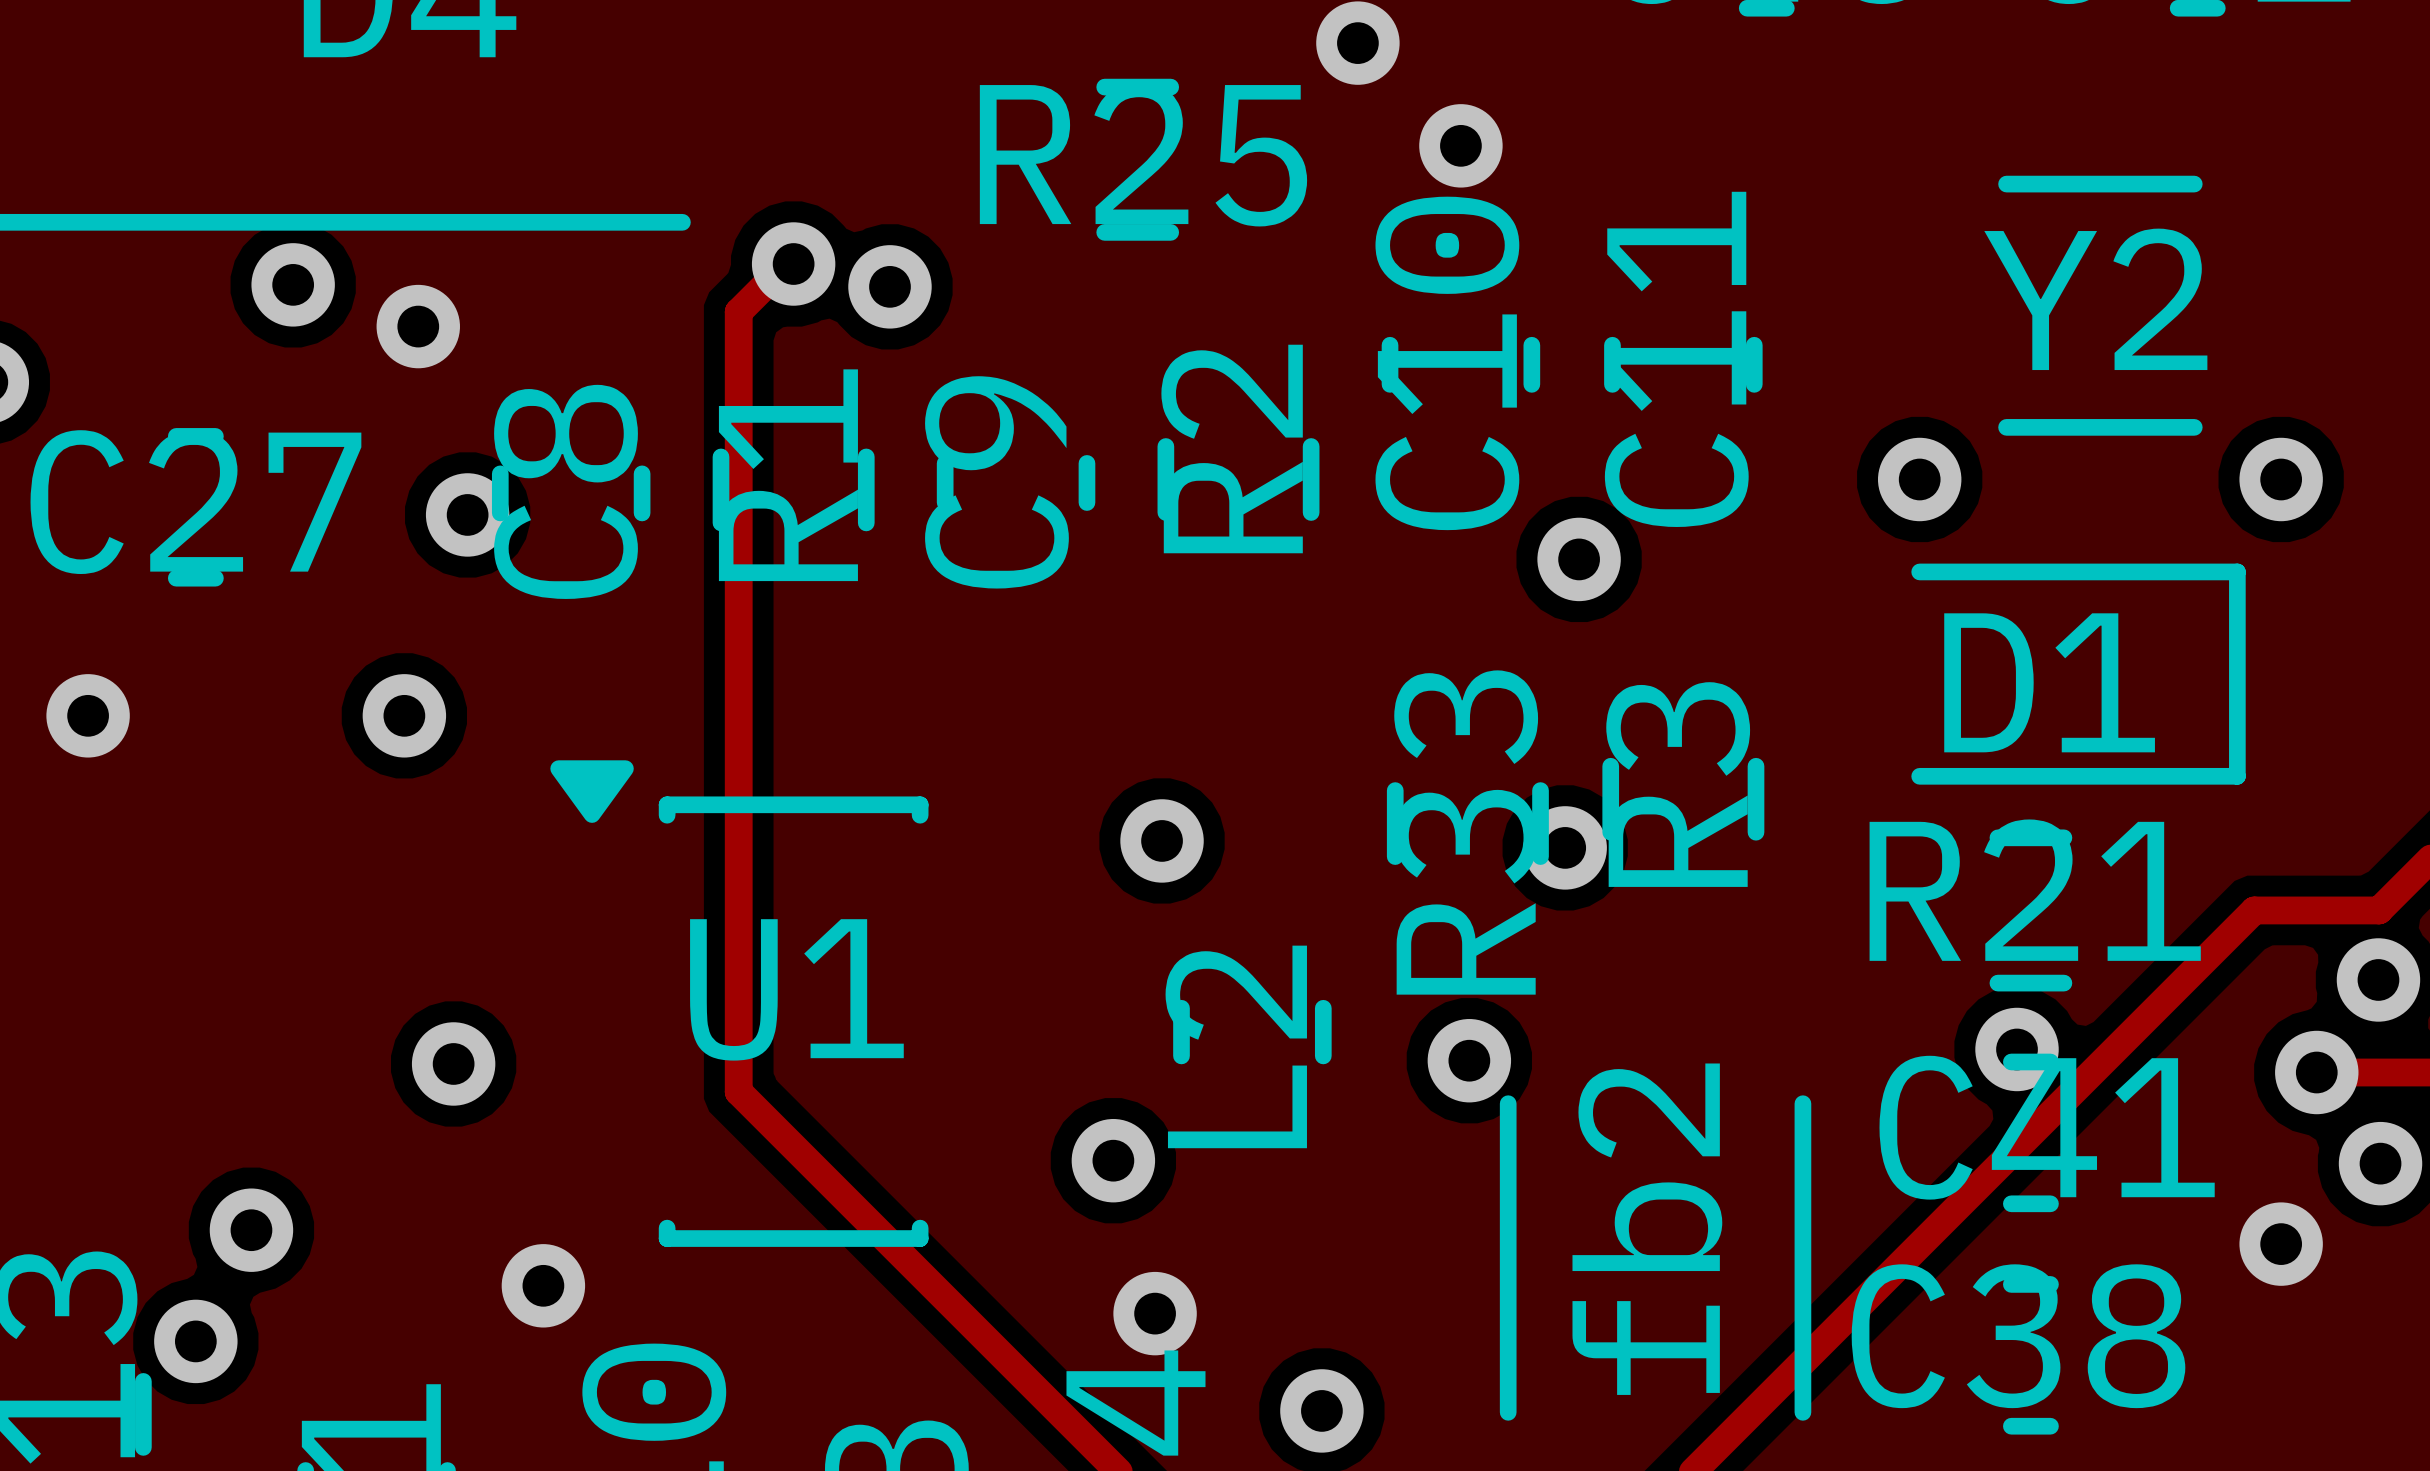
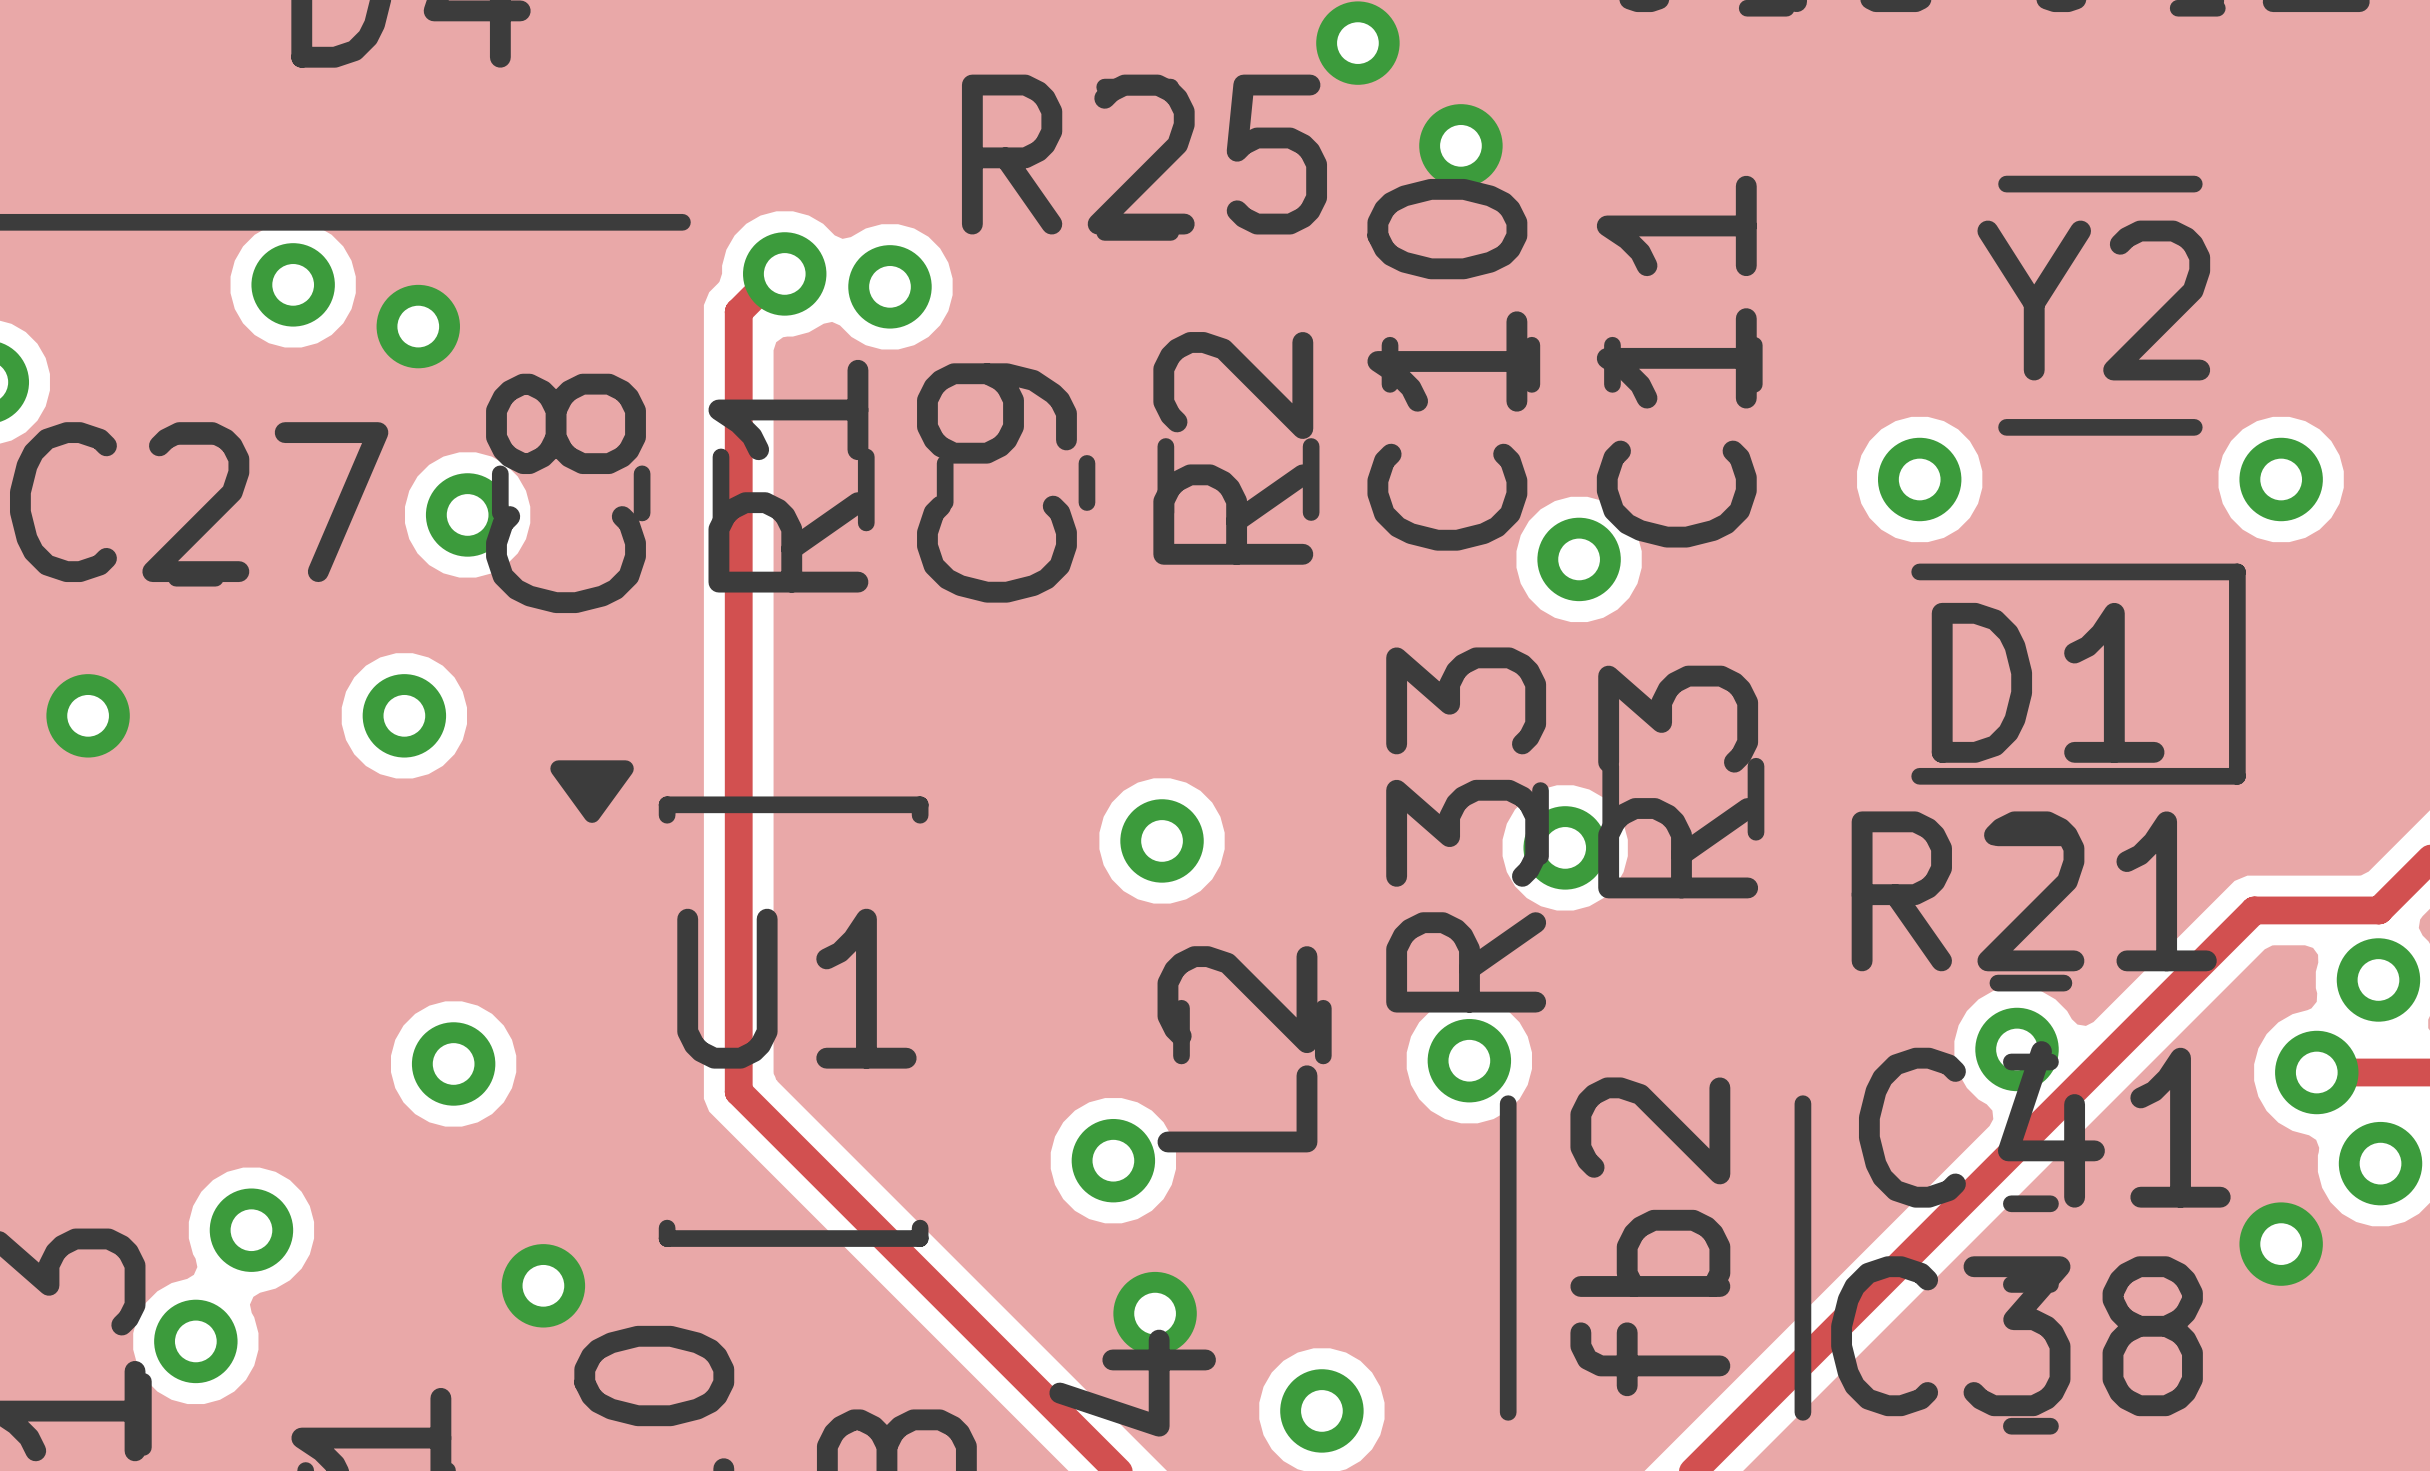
via position: (793, 264) -> (784, 273)

